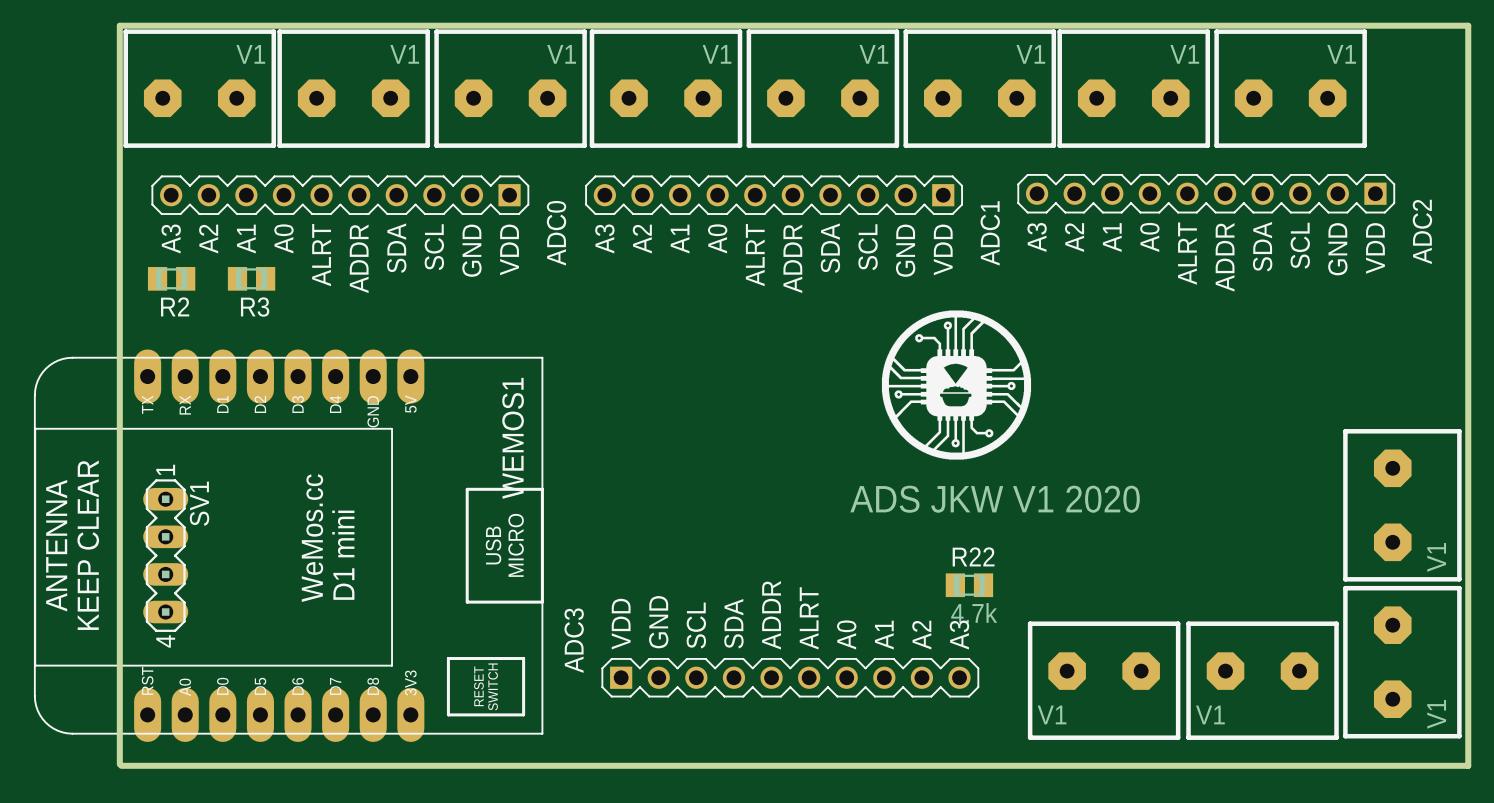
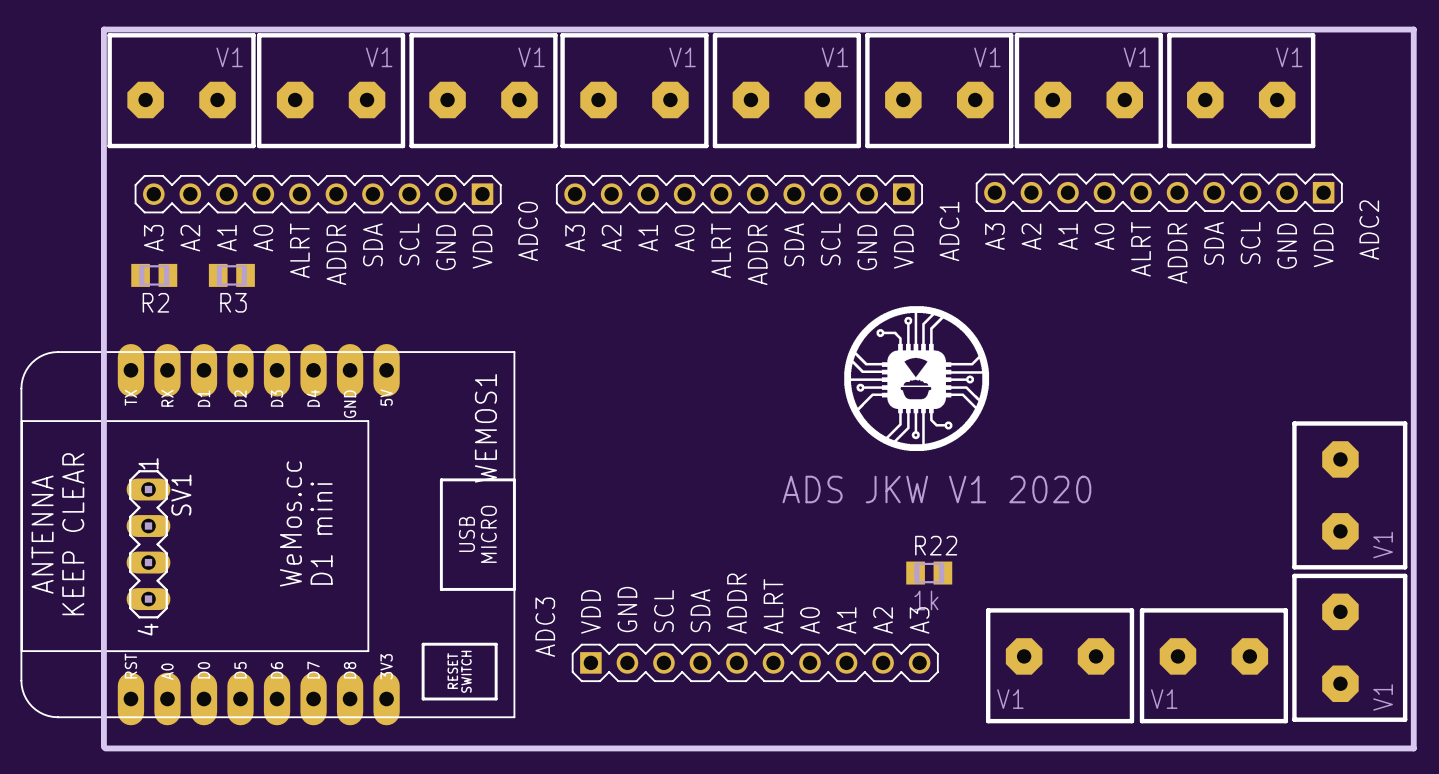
R22 value: 4.7k (974, 612) -> 1k (926, 600)

